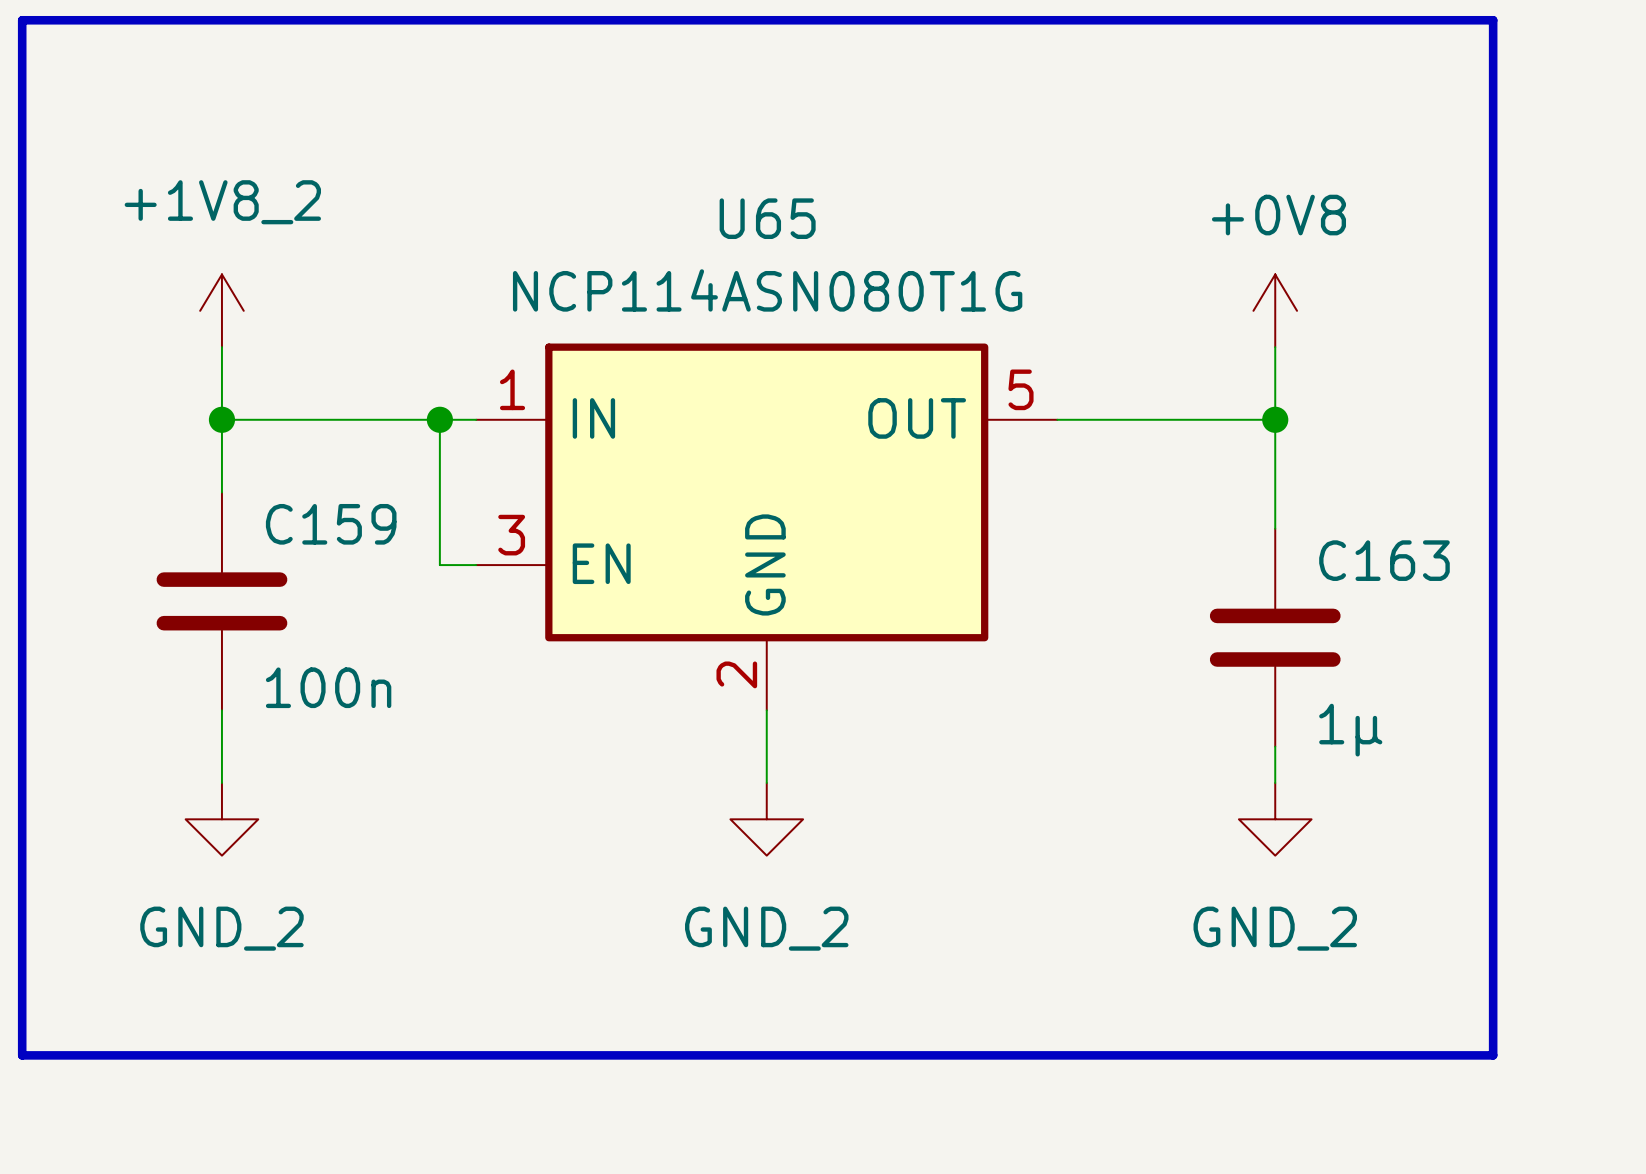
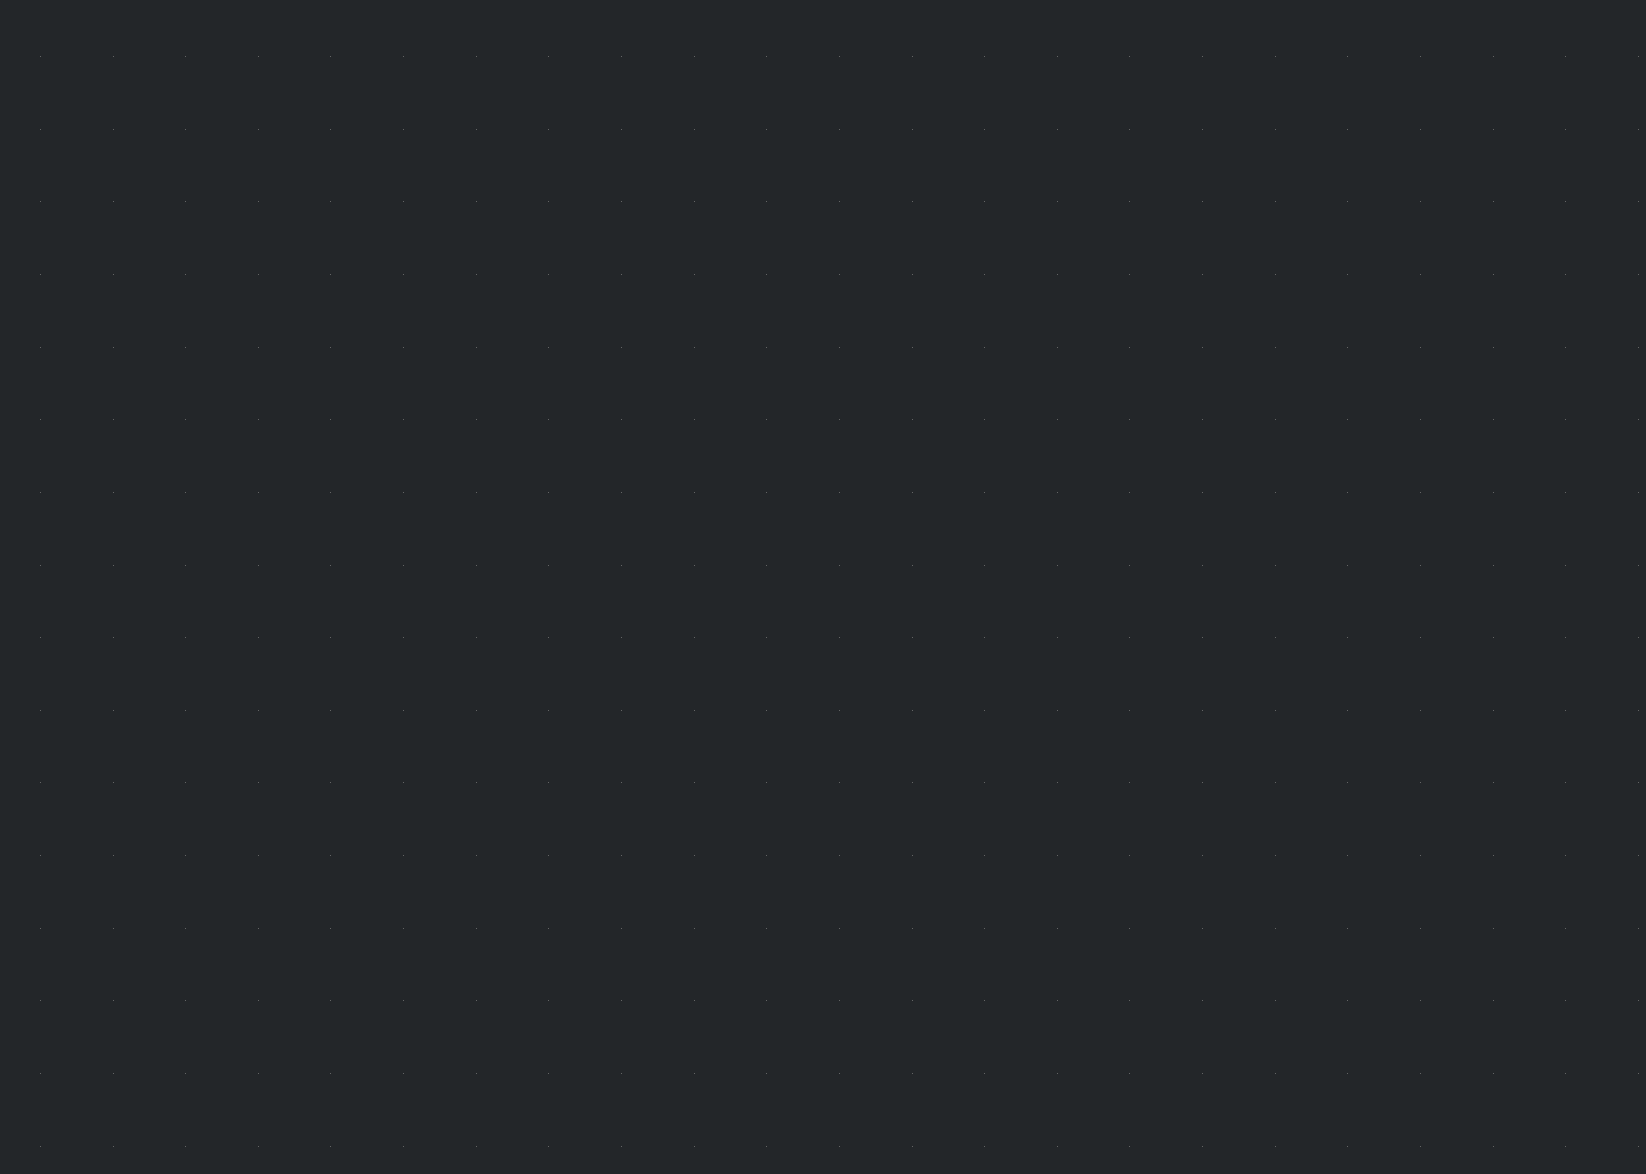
line: (22, 20) (1493, 20) (1493, 1055) (22, 1055) (22, 20) -> none
power symbol: +1V8_2 (221, 310) -> none
part: +0V8 (1275, 310) -> none
wire: (221, 347) (221, 492) -> none
wire: (1275, 347) (1275, 528) -> none
wire: (221, 419) (476, 419) -> none
junction: (221, 419) -> none
wire: (439, 419) (439, 565) (476, 565) -> none
junction: (439, 419) -> none
wire: (1057, 419) (1275, 419) -> none
junction: (1275, 419) -> none
U65: NCP114ASN080T1G (766, 526) -> none
C159: 100n (221, 601) -> none
C163: 1µ (1275, 637) -> none
wire: (221, 710) (221, 782) -> none
wire: (766, 710) (766, 782) -> none
wire: (1275, 746) (1275, 782) -> none
power symbol: GND_2 (221, 819) -> none
power symbol: GND_2 (766, 819) -> none
power symbol: GND_2 (1275, 819) -> none

